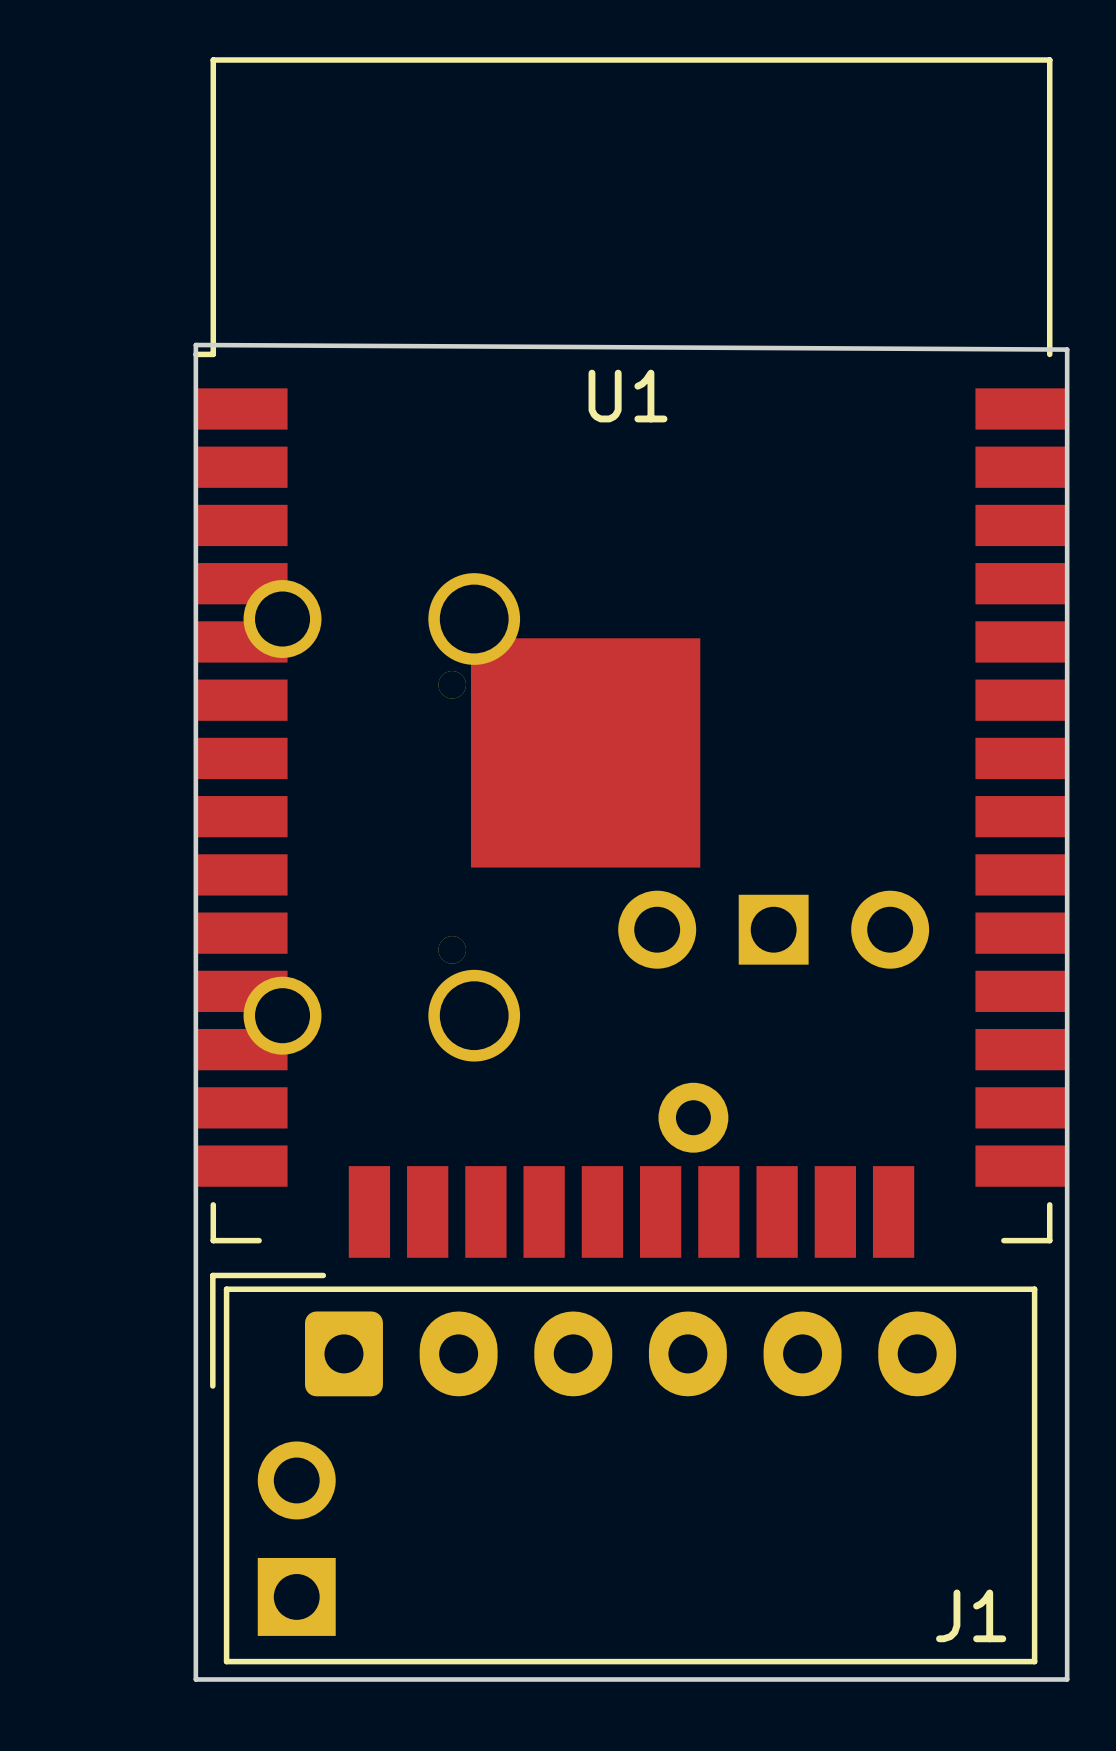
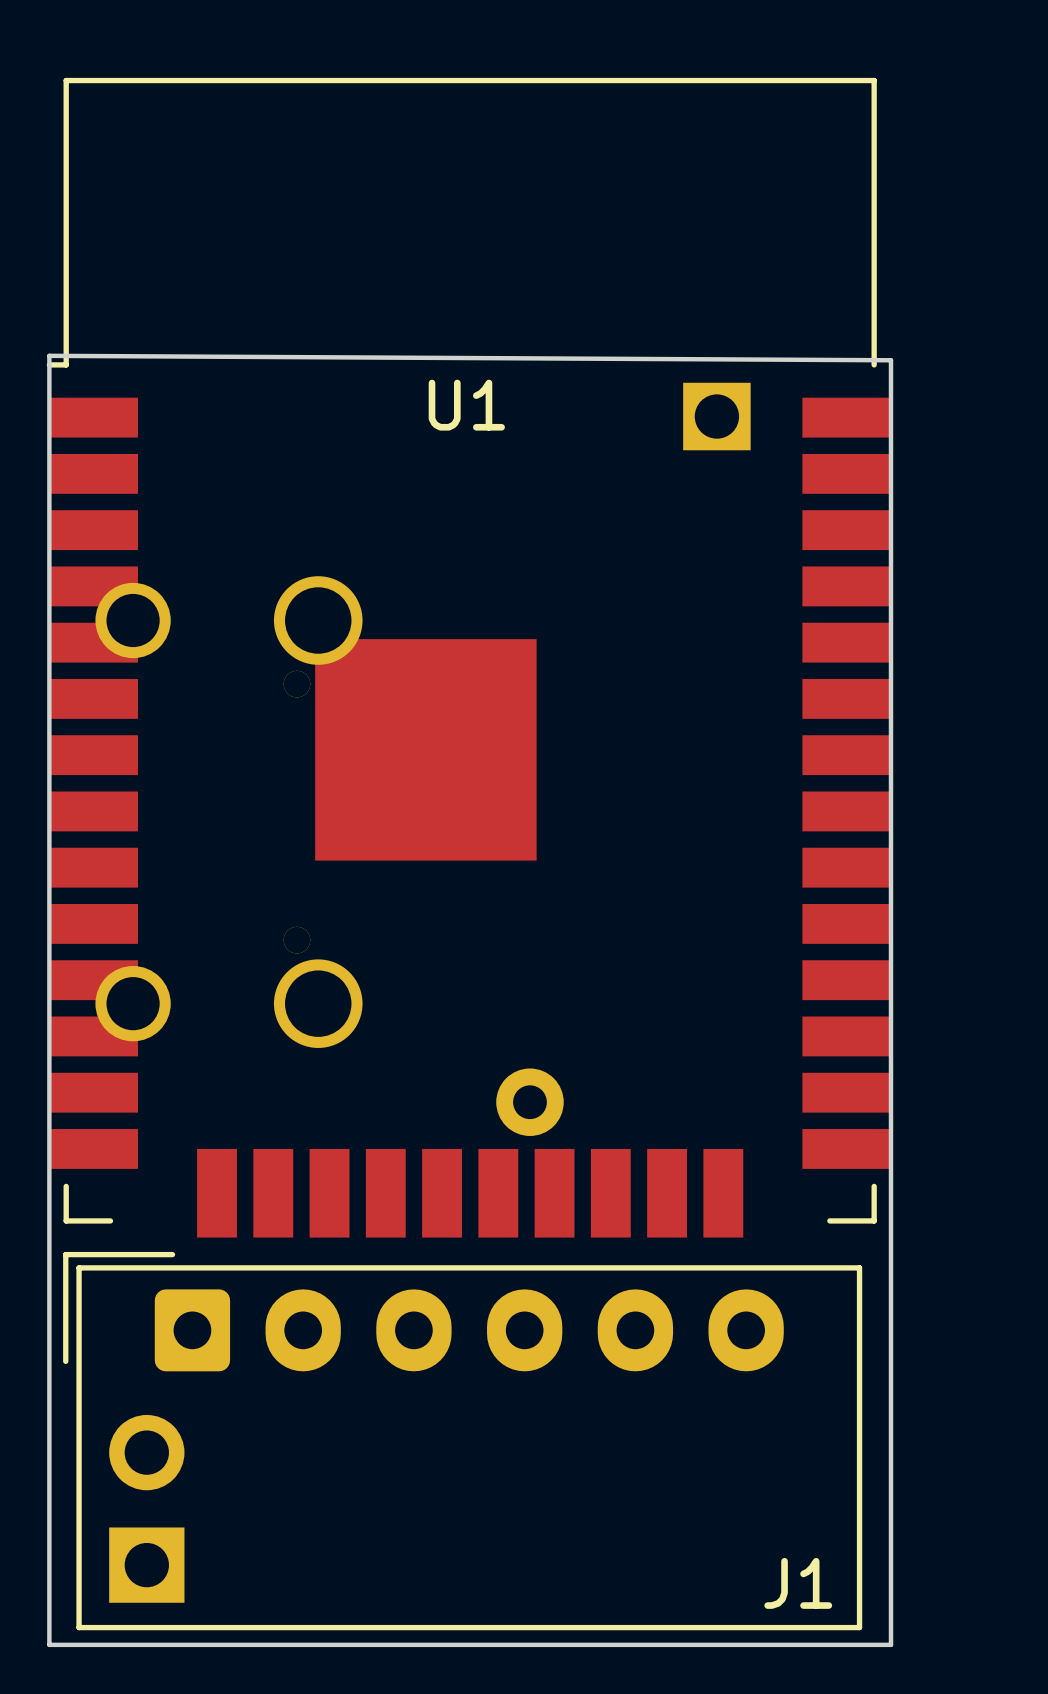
part: none -> (716, 416)
part: (773, 929) -> none

